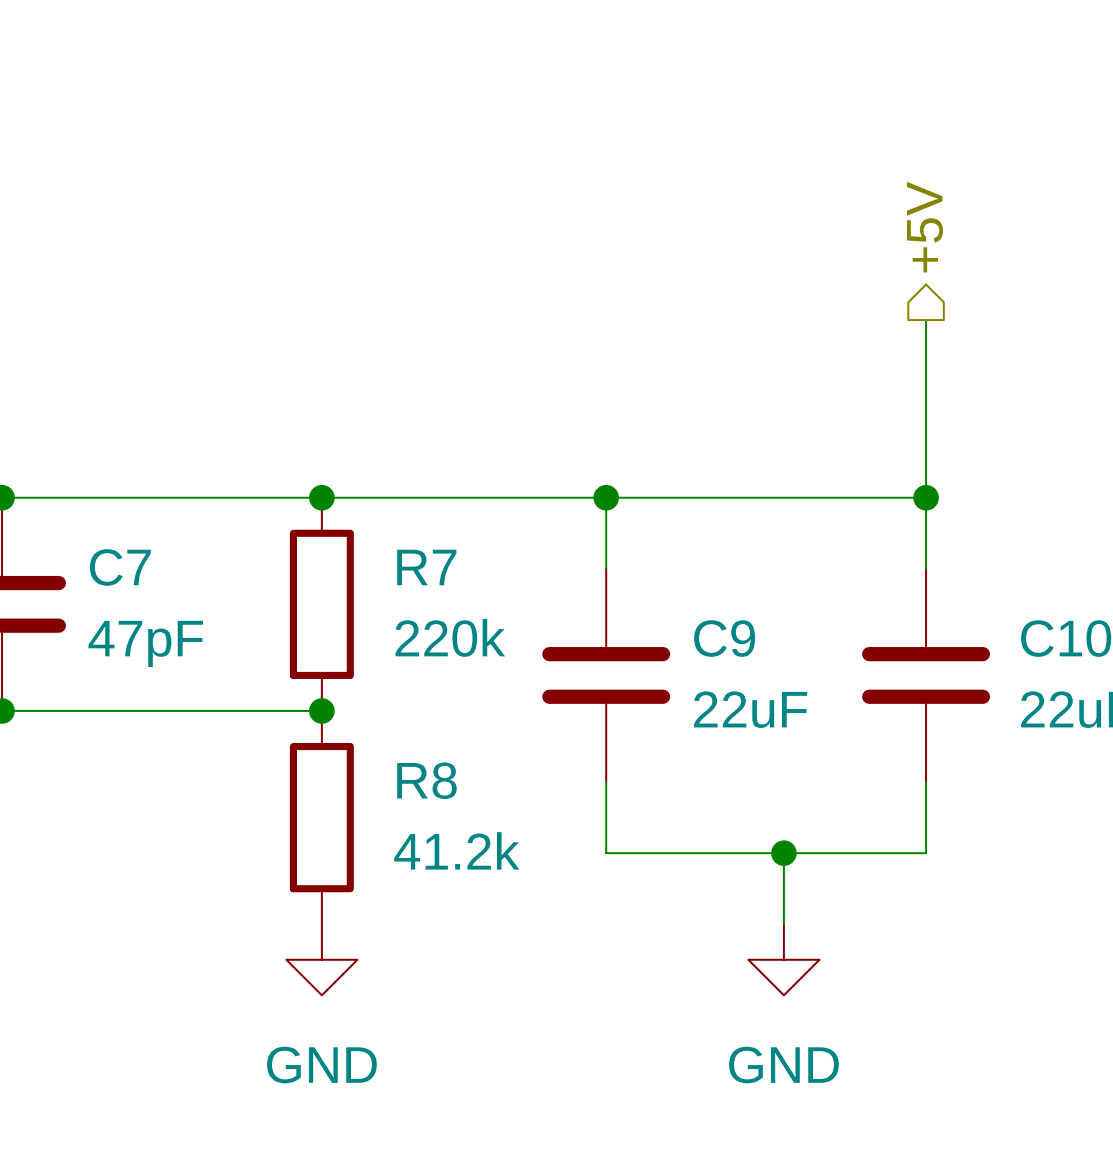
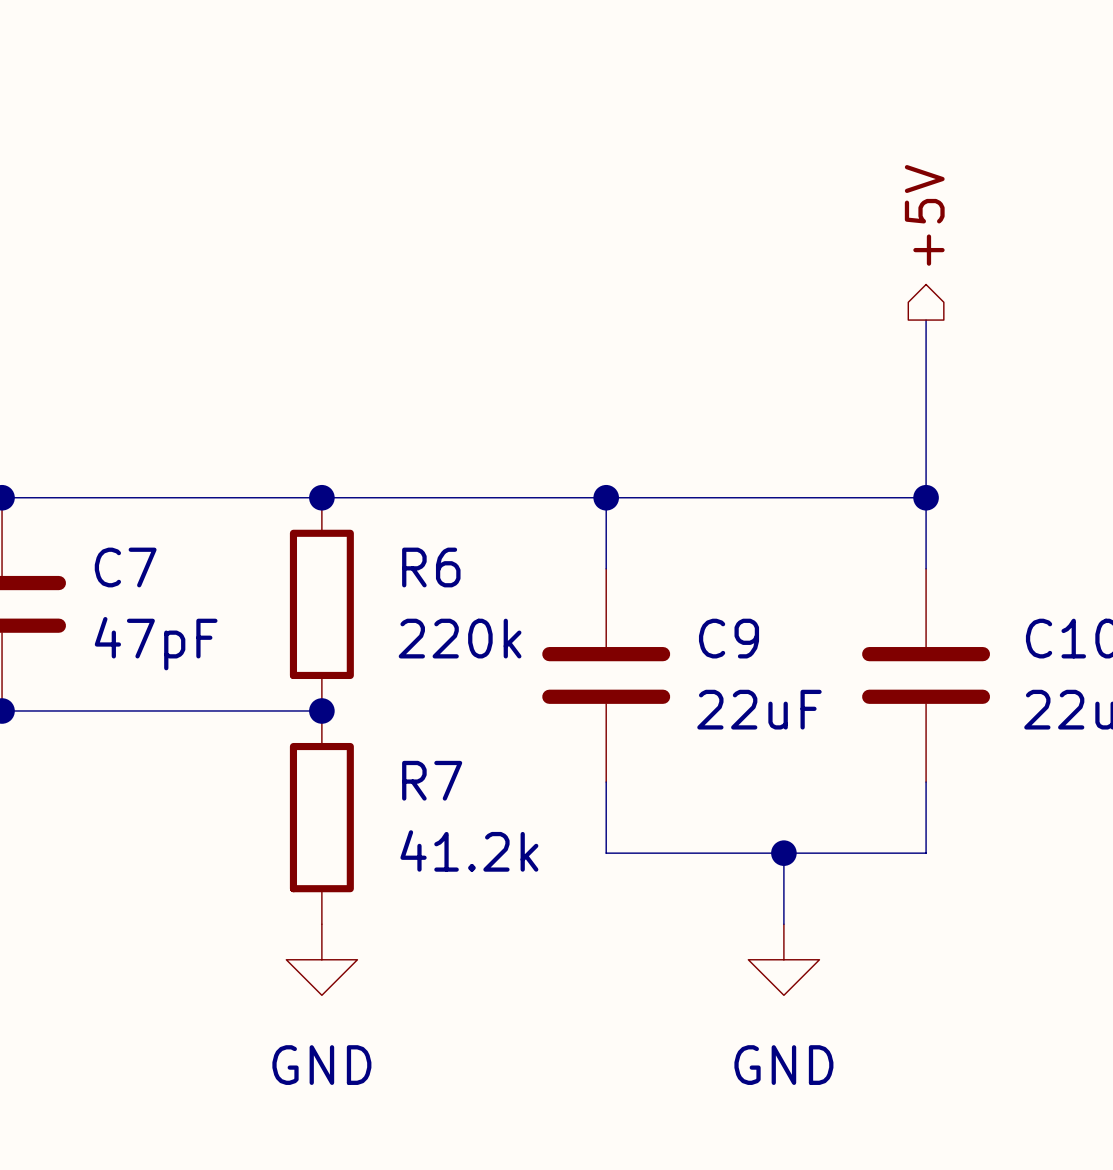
R7 name: R7 (426, 567) -> R6 (431, 567)
R8 name: R8 (426, 780) -> R7 (432, 780)

